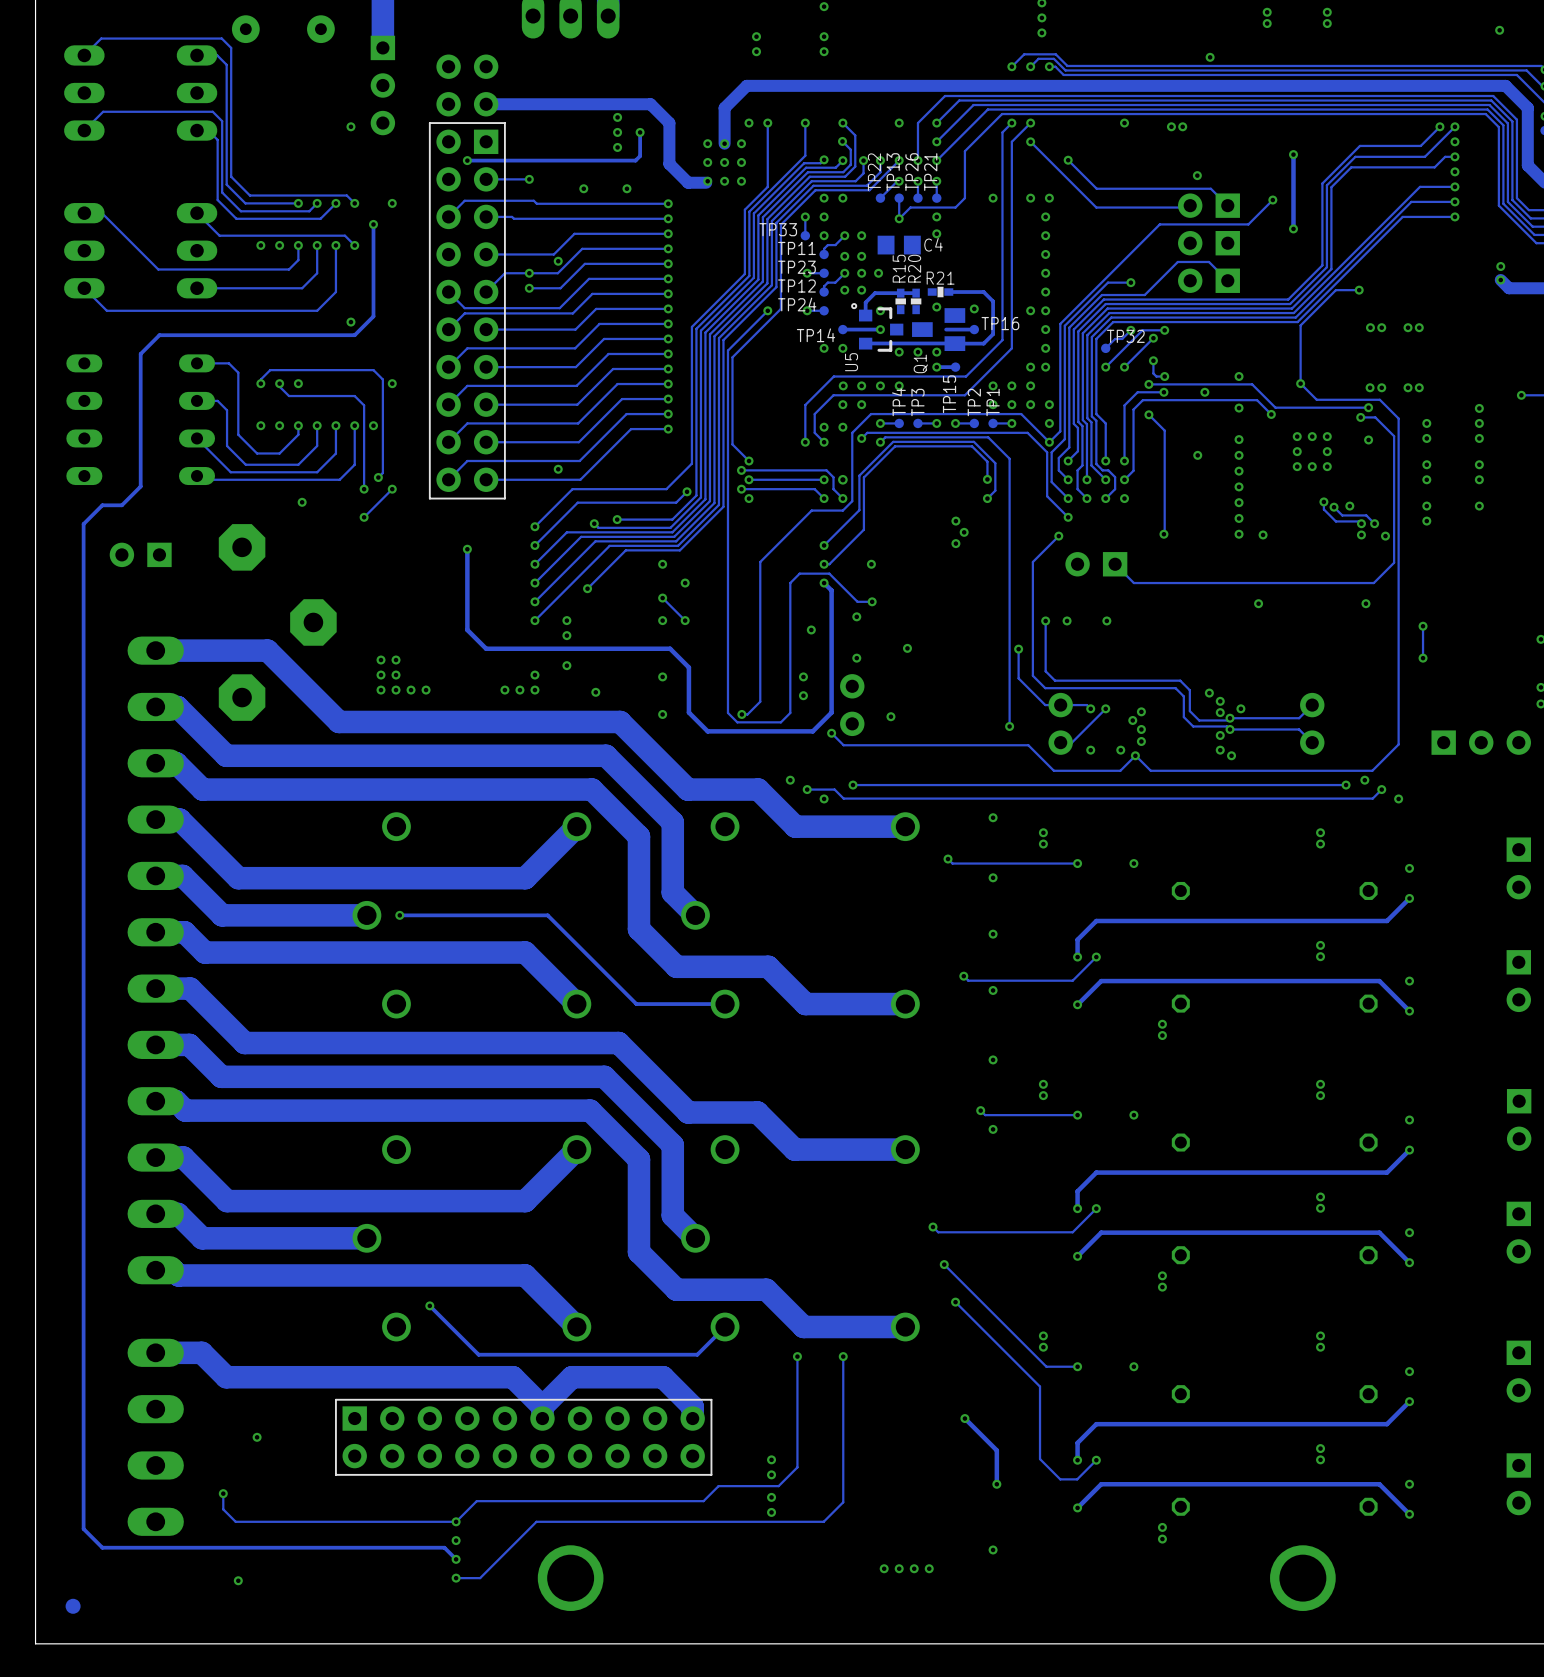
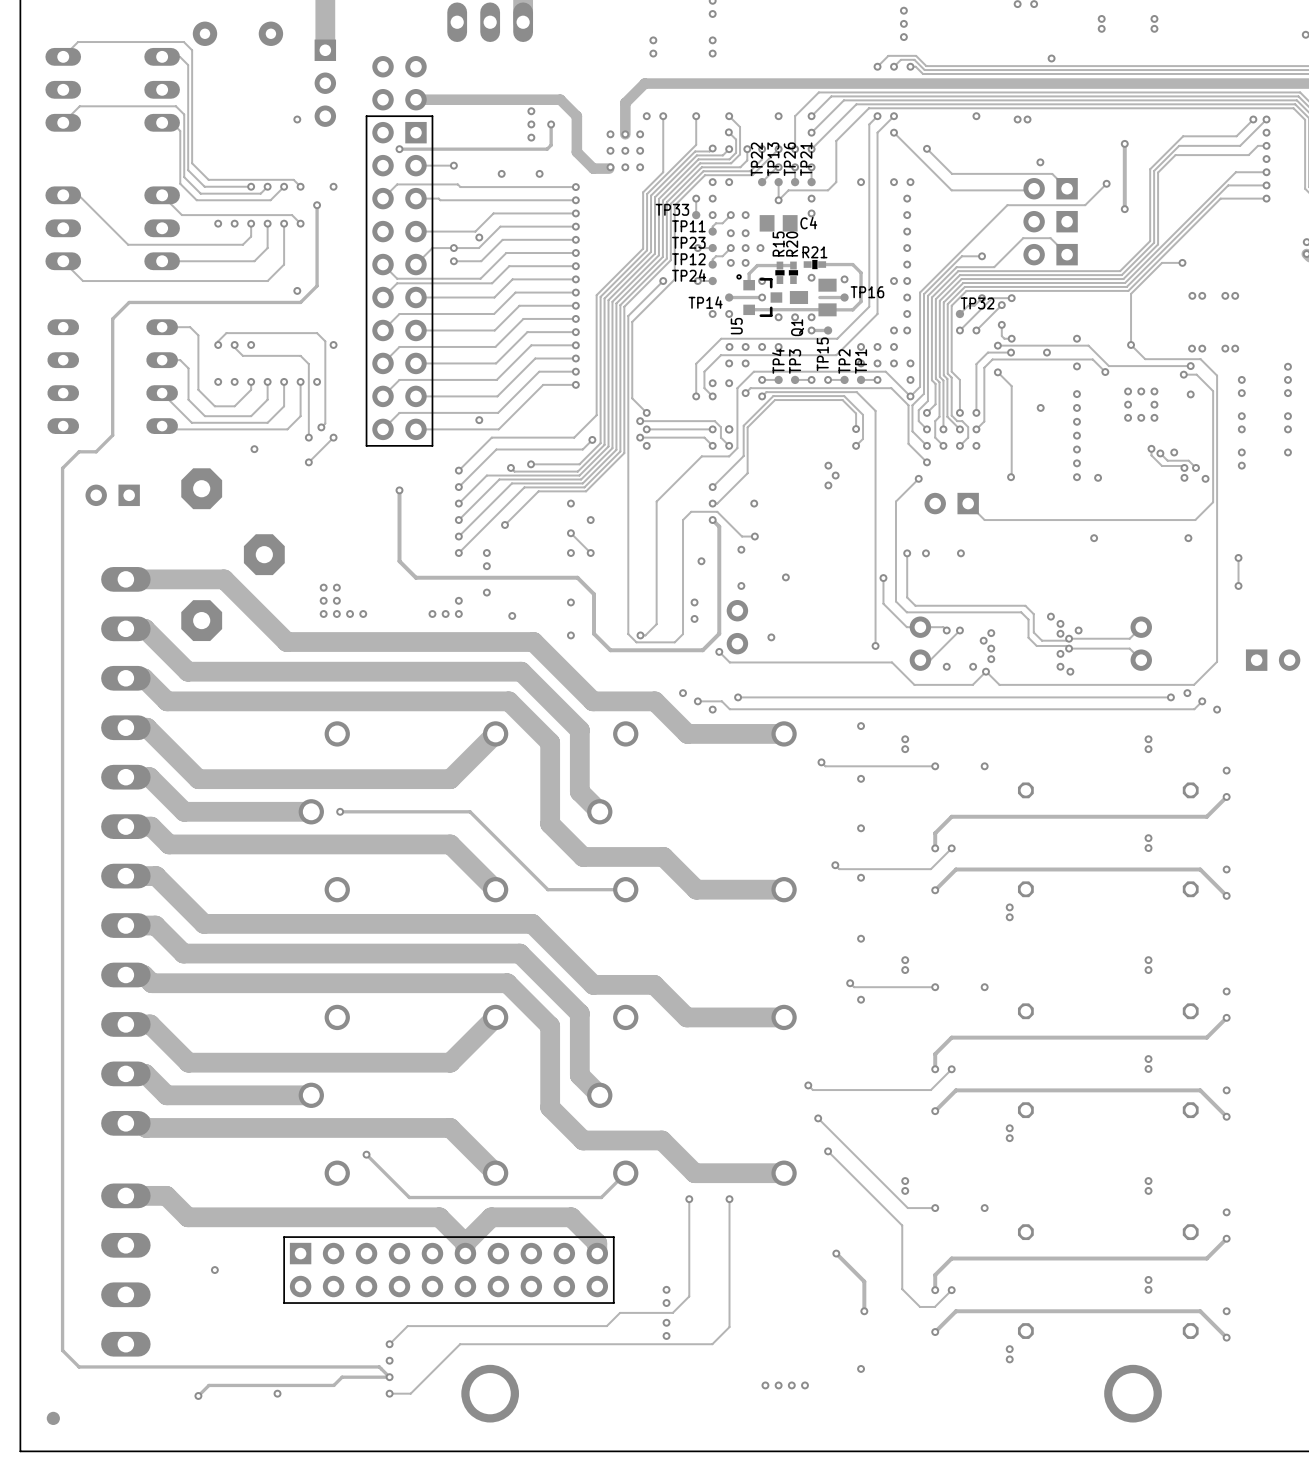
track: (223, 1493) (223, 1509) (235, 1521) (456, 1521) -> none
via: (223, 1493) -> none
track: none -> (389, 1377) (342, 1377) (333, 1385) (208, 1385) (198, 1395)
via: none -> (277, 1393)

